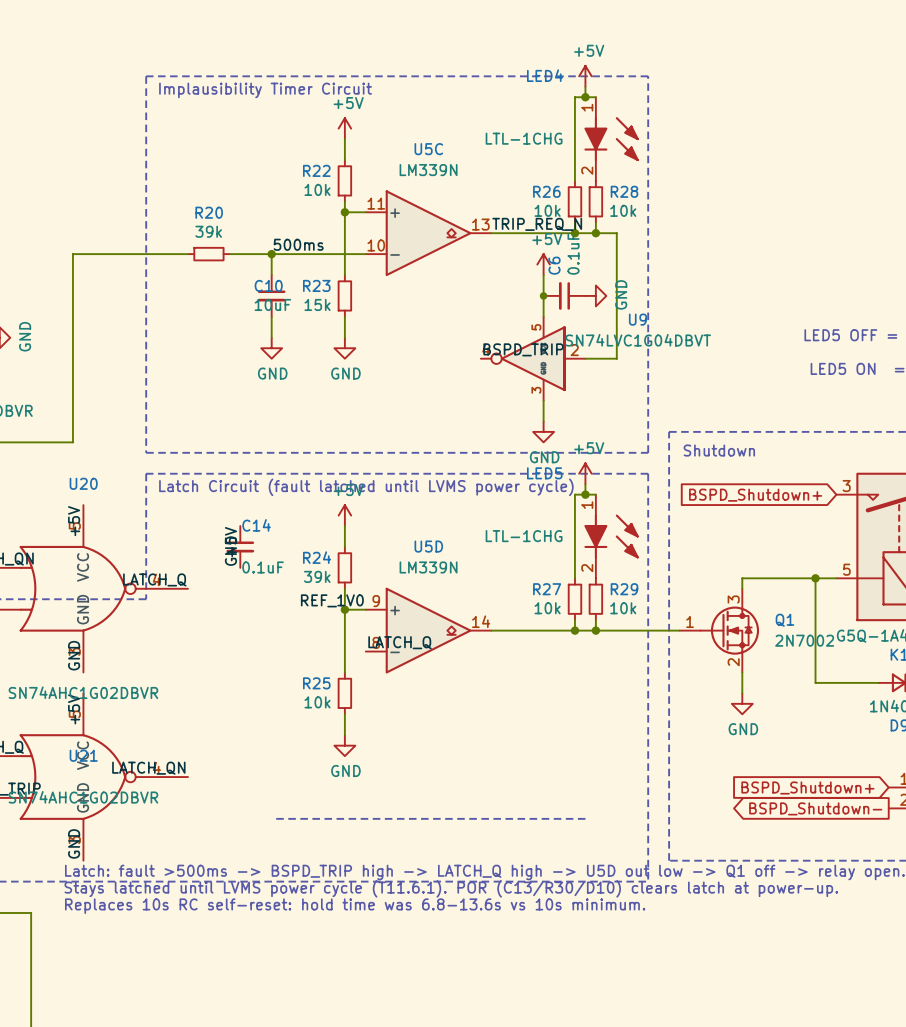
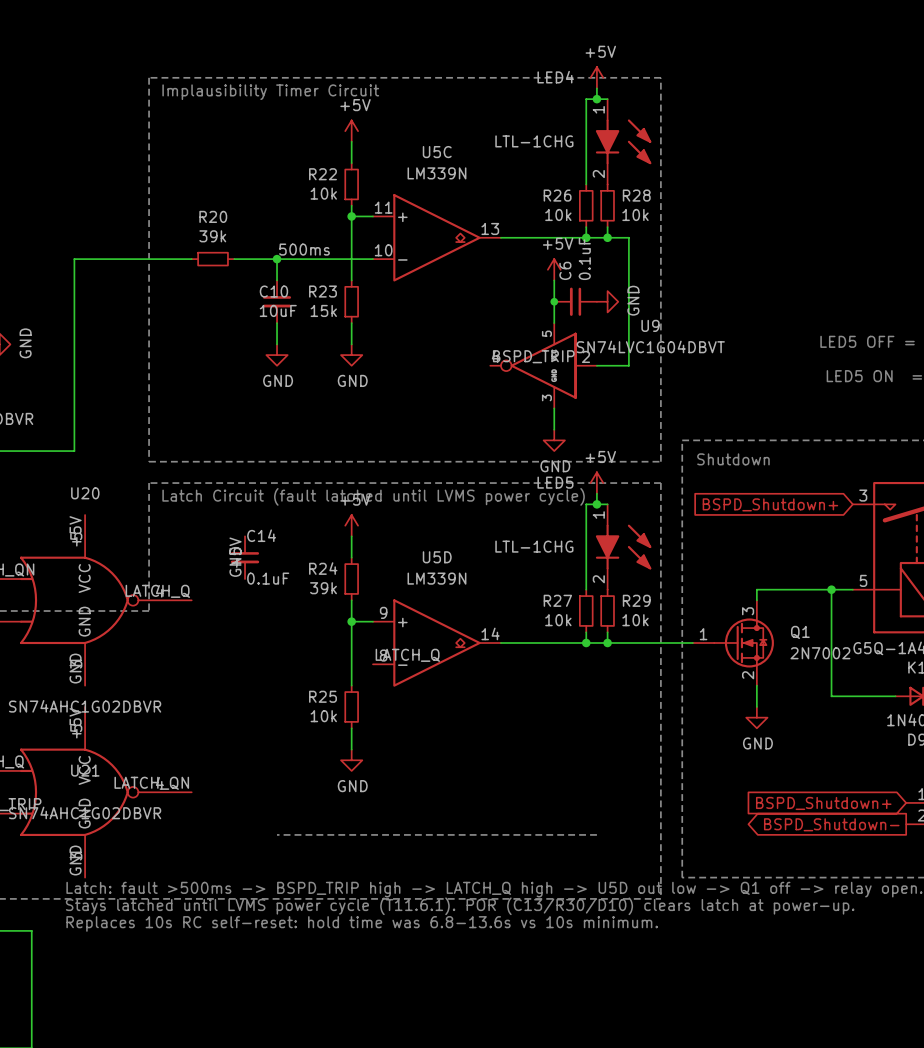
label: TRIP_REQ_N (537, 224) -> none
label: REF_1V0 (332, 600) -> none

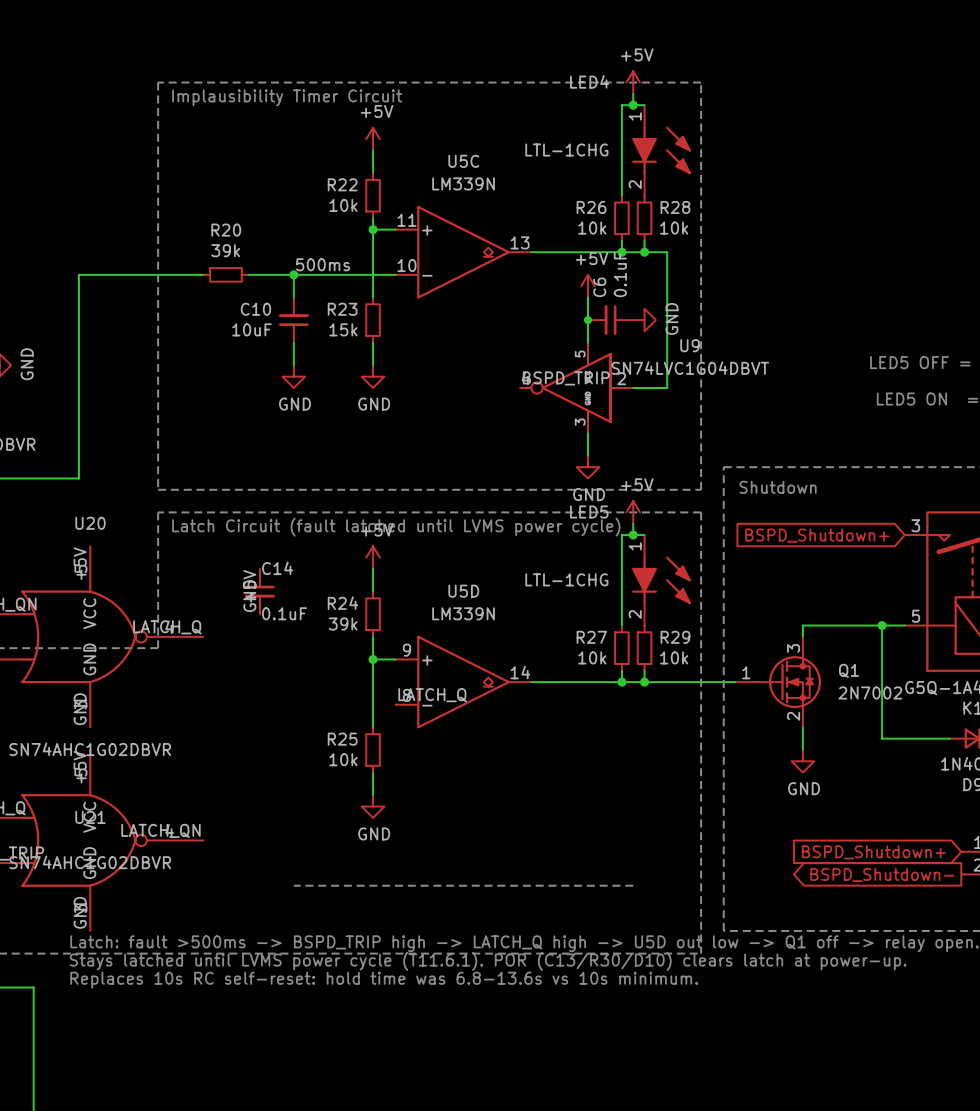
C10 name position: C10 (273, 291) -> C10 (255, 309)
C10 rotation: 0° (277, 301) -> 180° (293, 320)
C10 value position: 10uF (278, 310) -> 10uF (251, 329)

